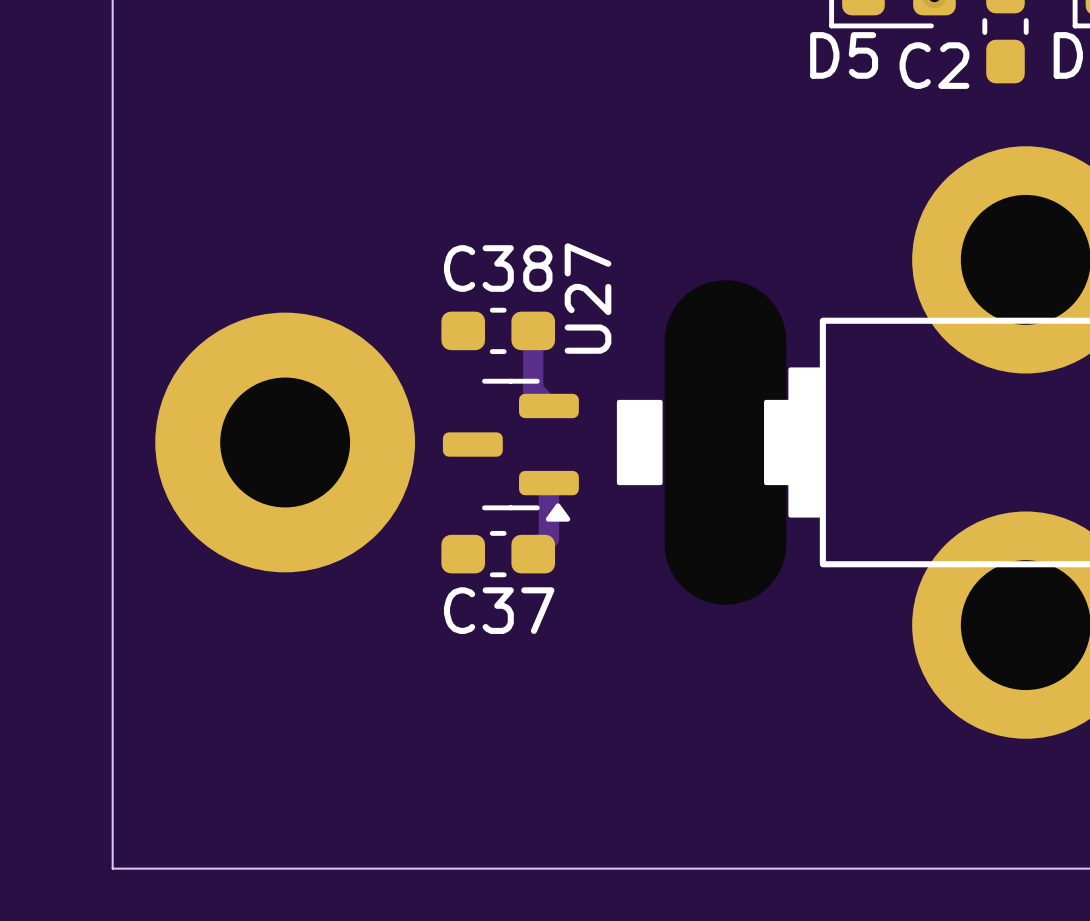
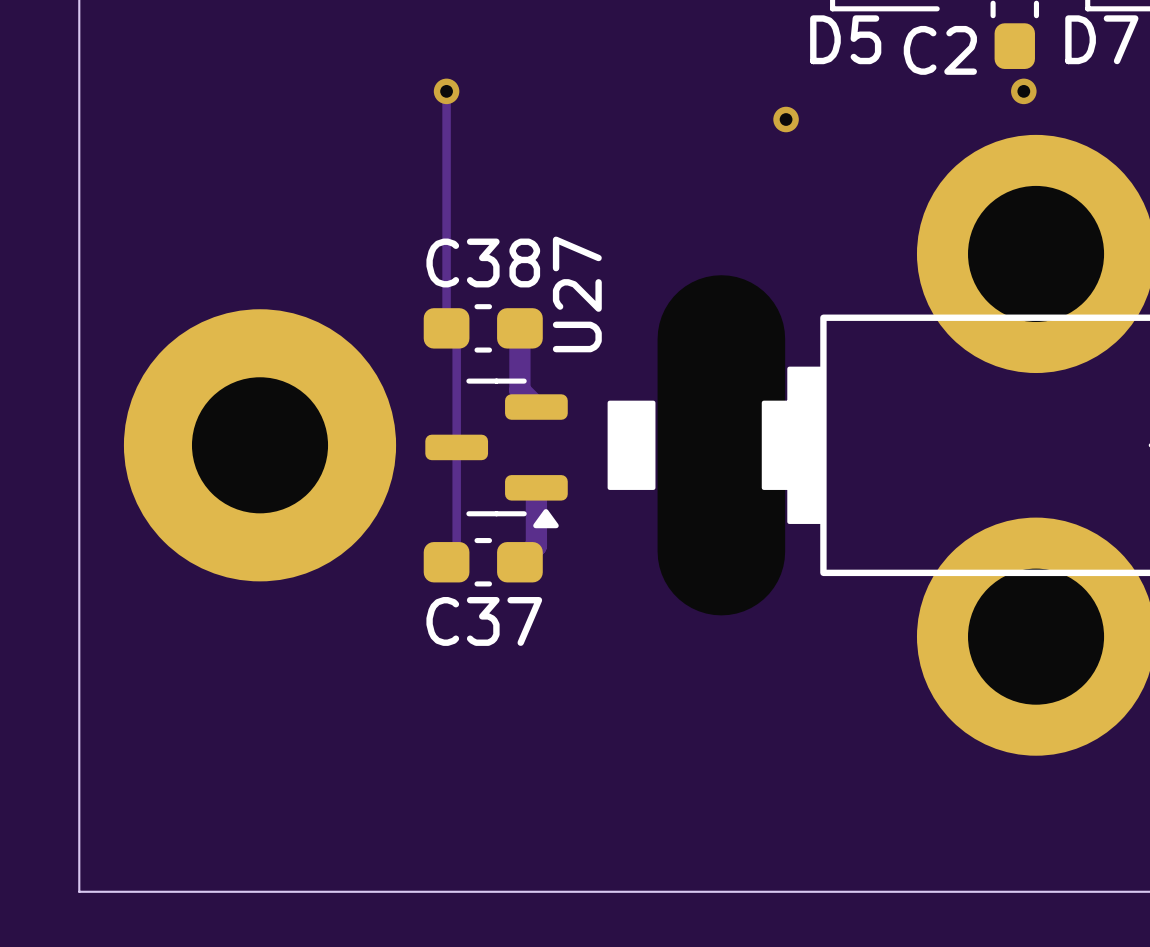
track: none -> (446, 91) (446, 328) (456, 338) (456, 552) (446, 562)
via: none -> (446, 91)
via: none -> (1023, 91)
via: none -> (786, 119)

